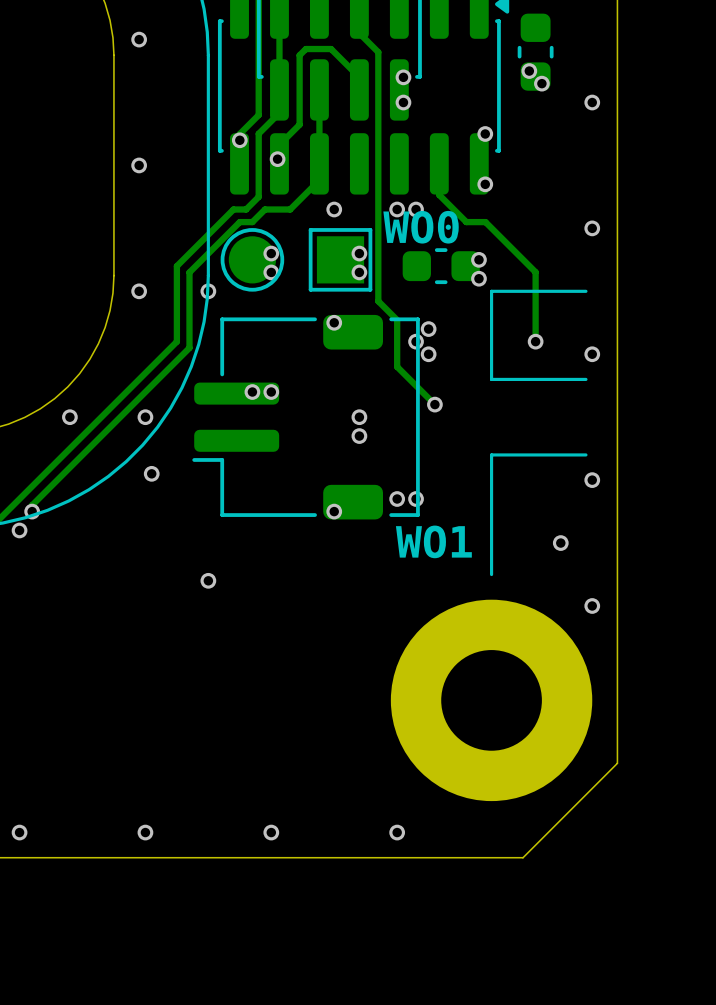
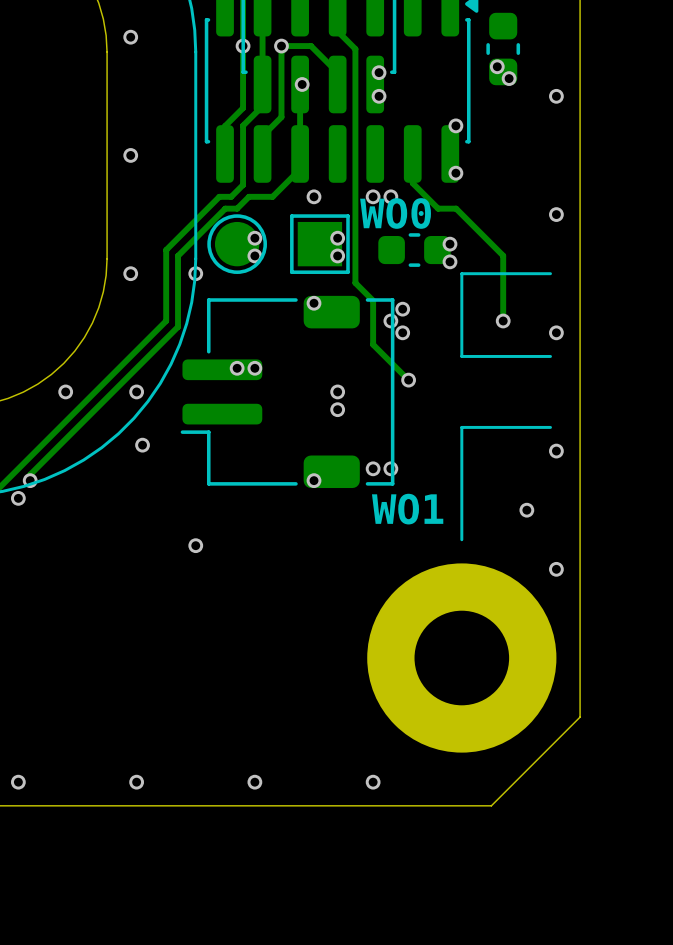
via: none -> (243, 46)
via: none -> (281, 46)
via: none -> (302, 84)
via: (239, 140) -> none
via: (277, 159) -> none

